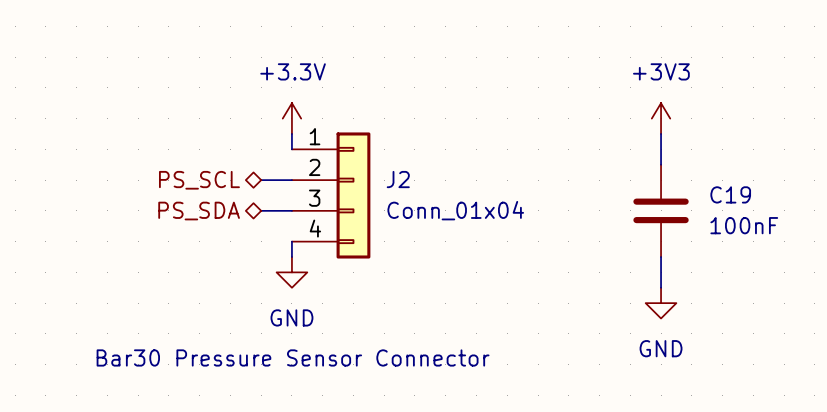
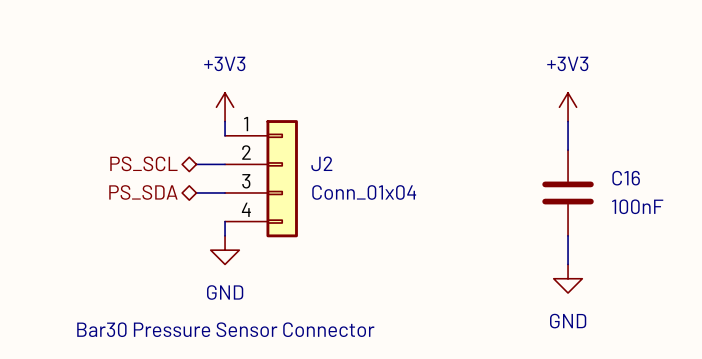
power symbol: +3.3V (291, 118) -> +3V3 (225, 107)
C19 name: C19 (730, 194) -> C16 (626, 178)

